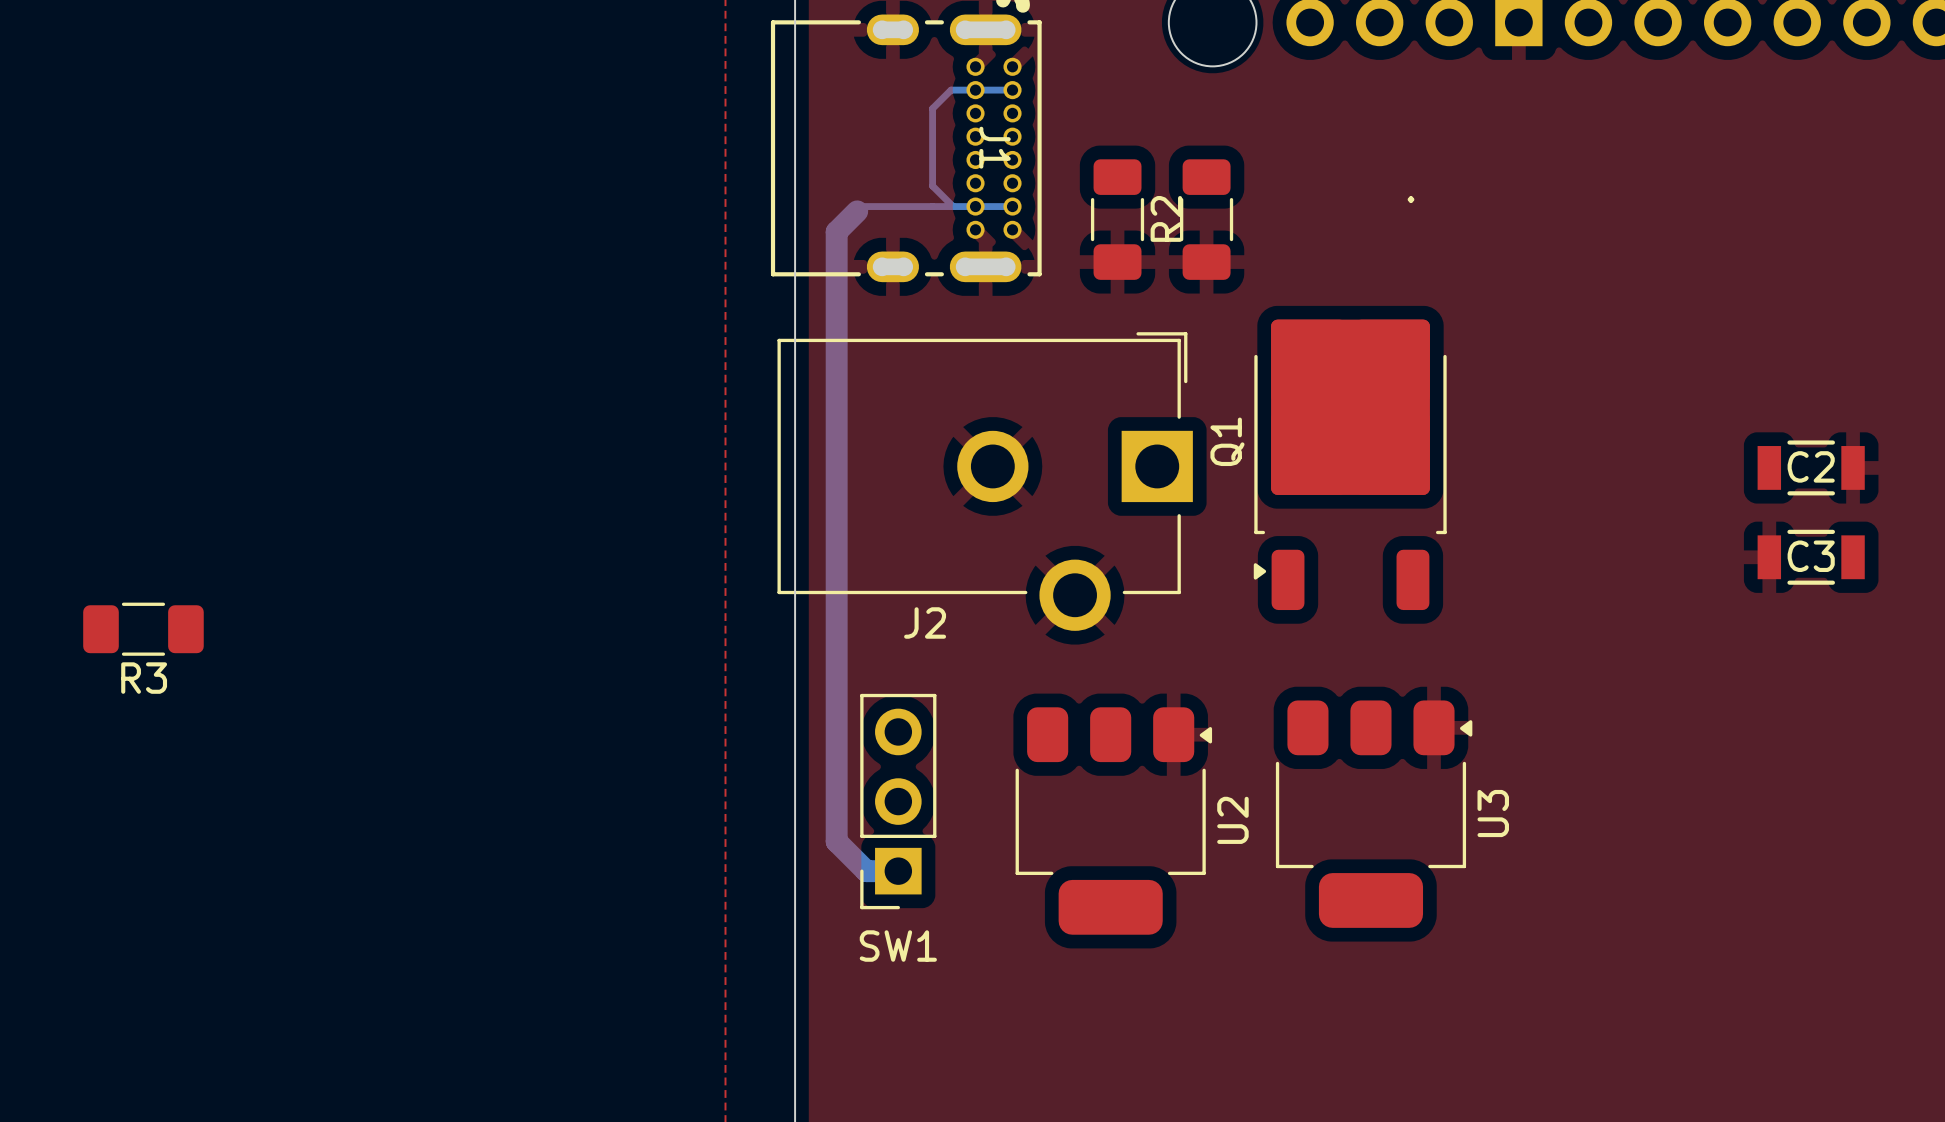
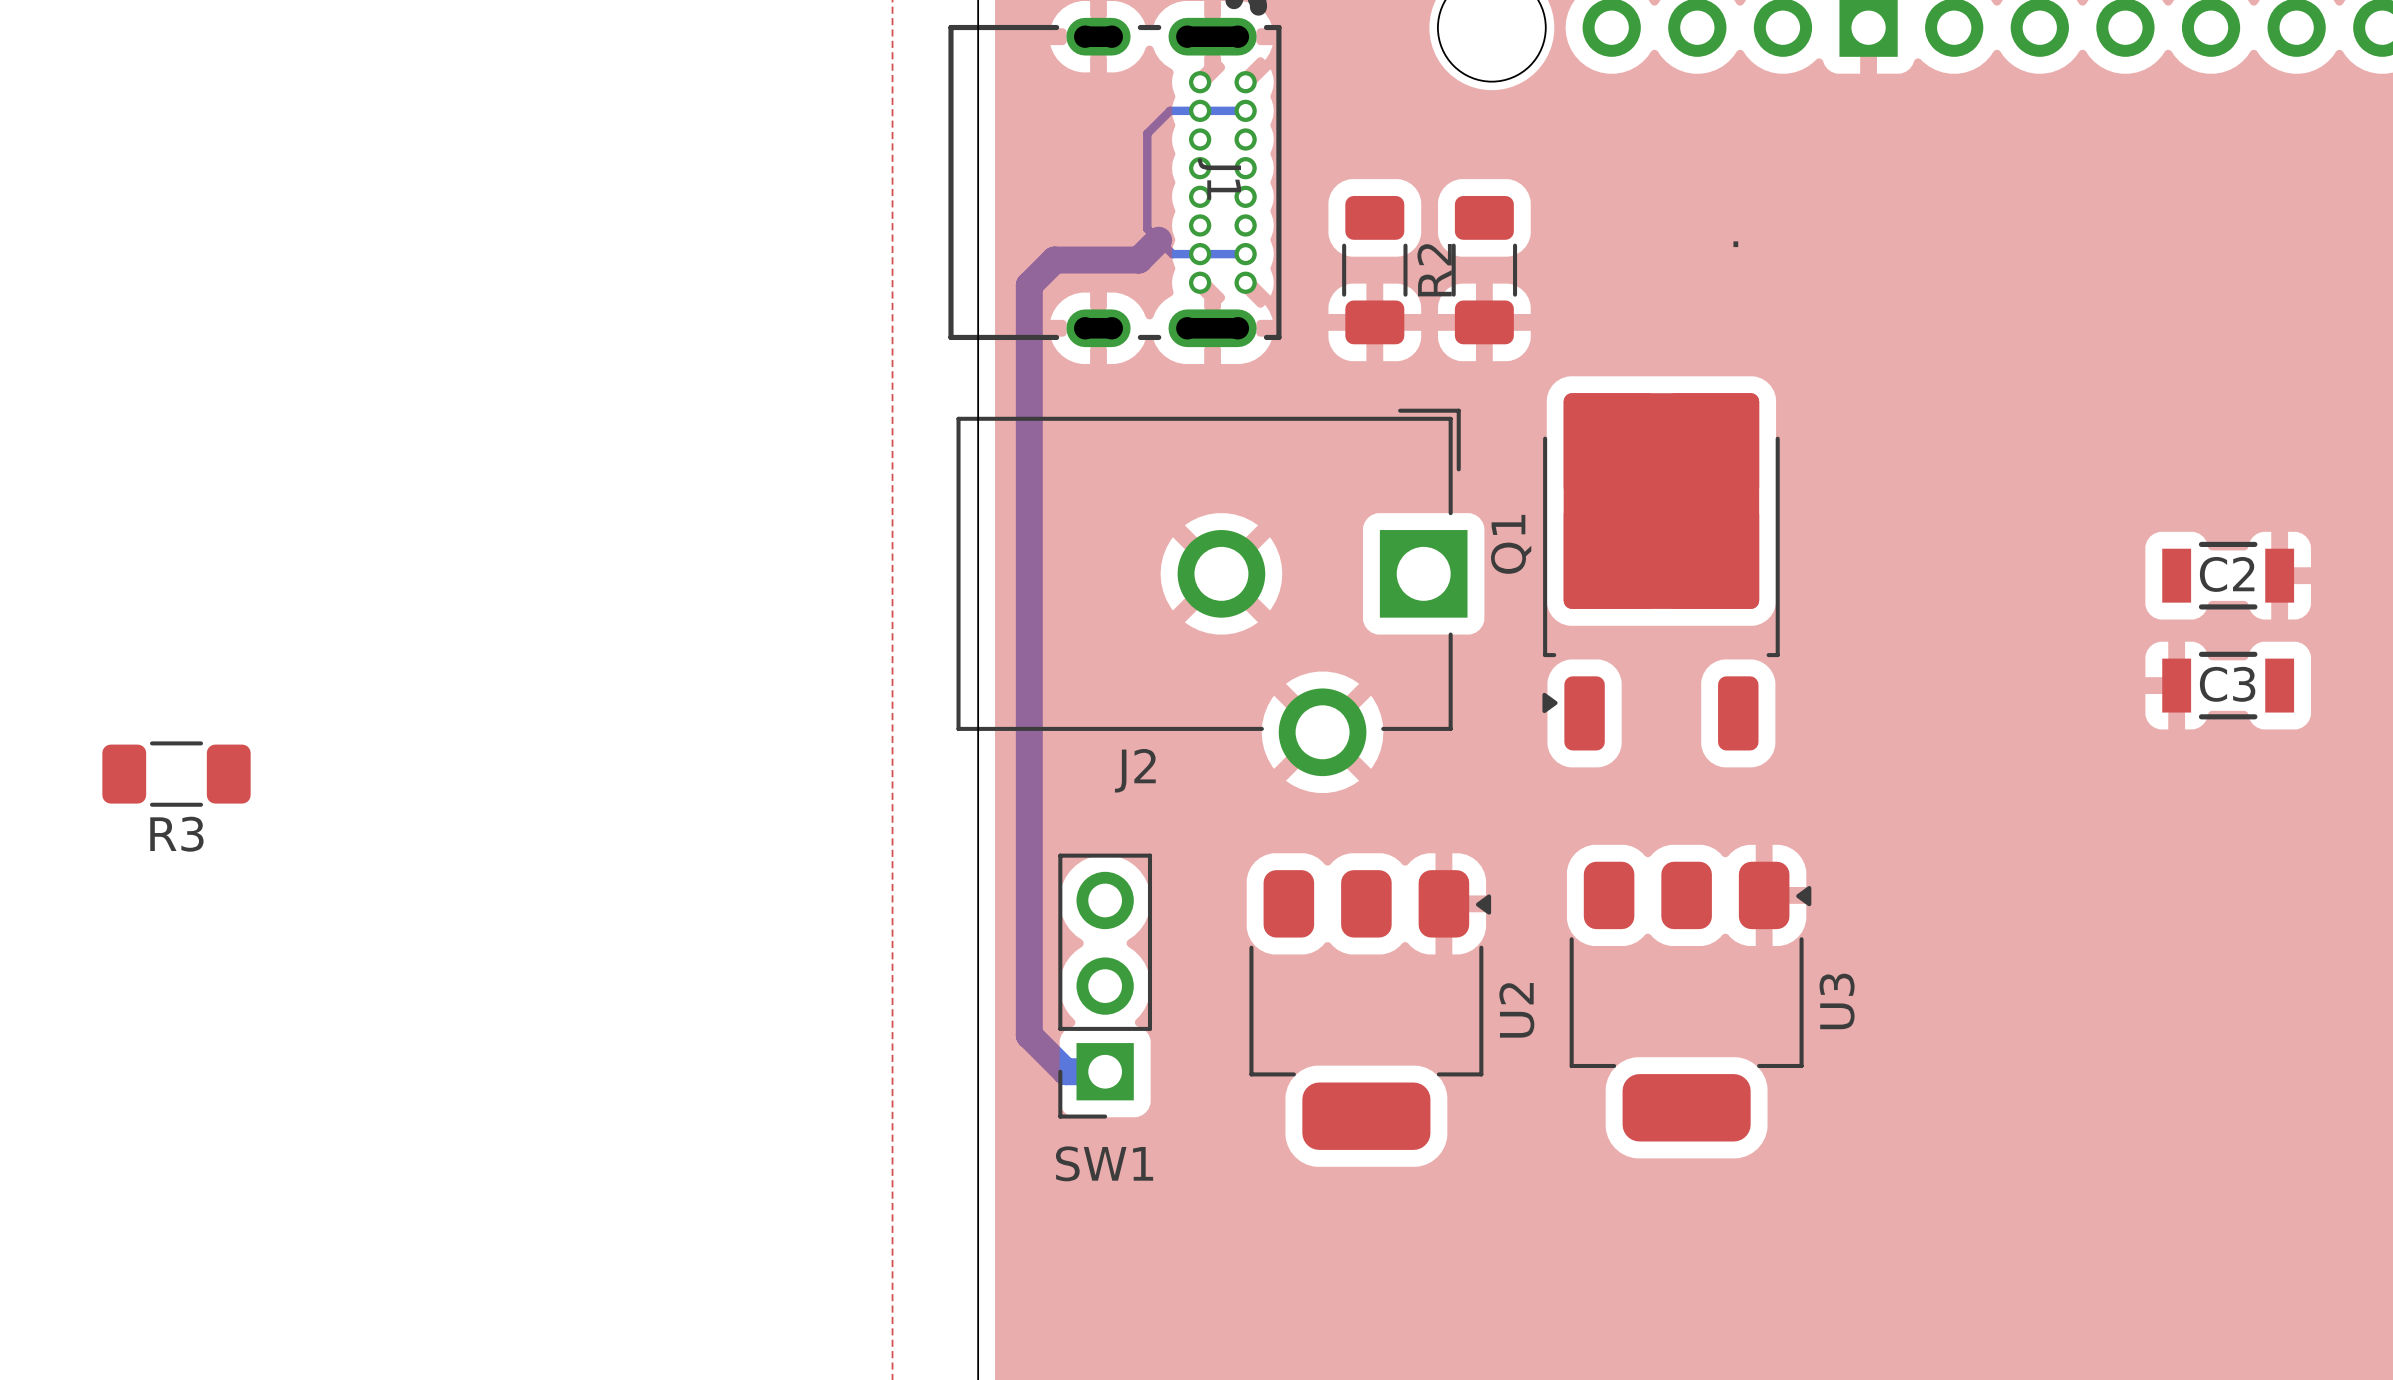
bottom track: none -> (1158, 240) (1138, 260) (1054, 260)
bottom track: (862, 206) (953, 206) -> none

